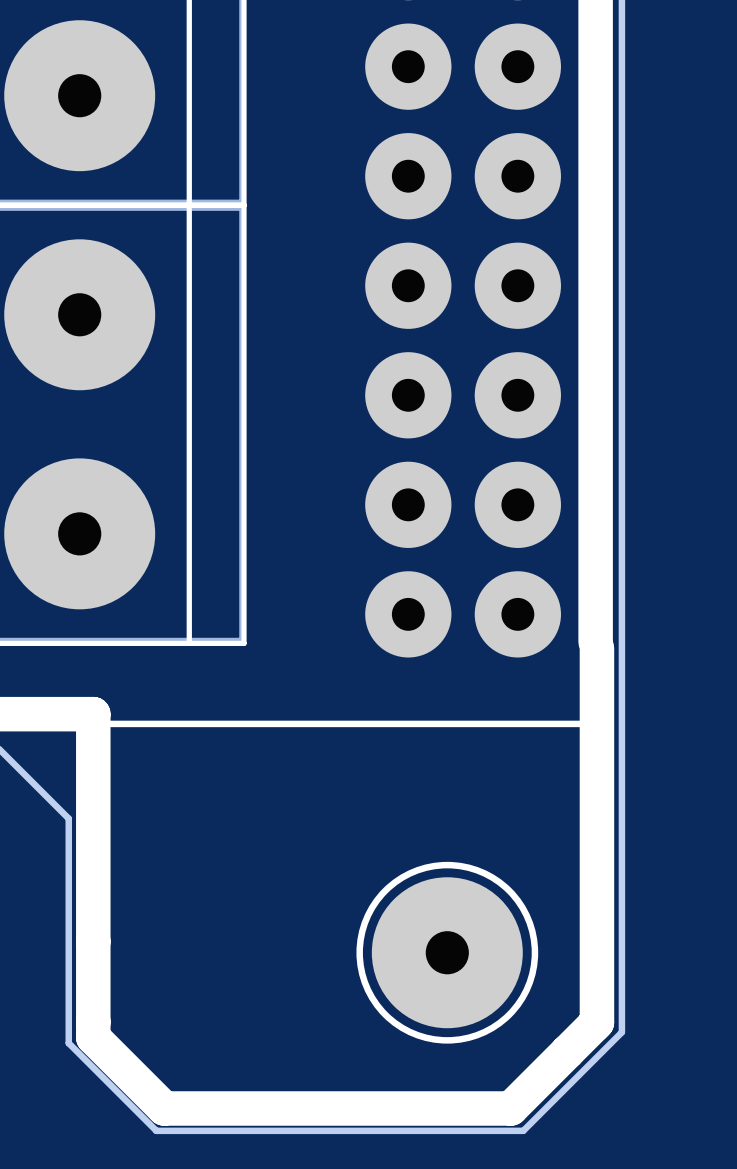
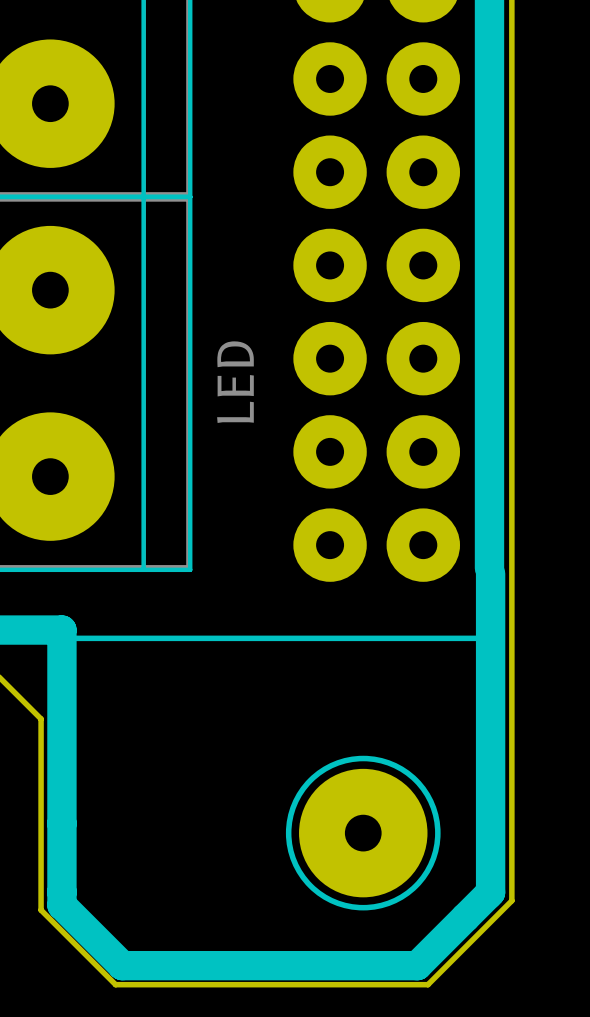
part value: none -> LED (235, 382)

